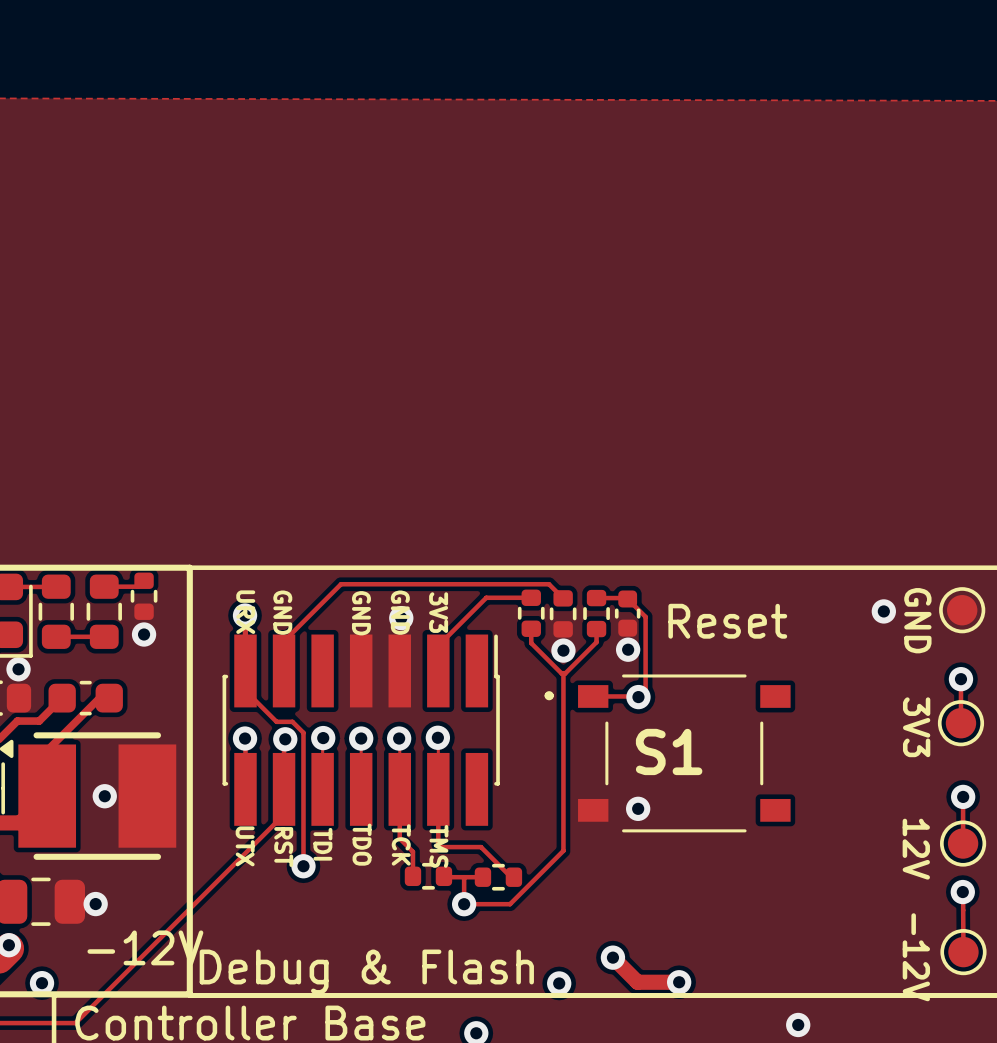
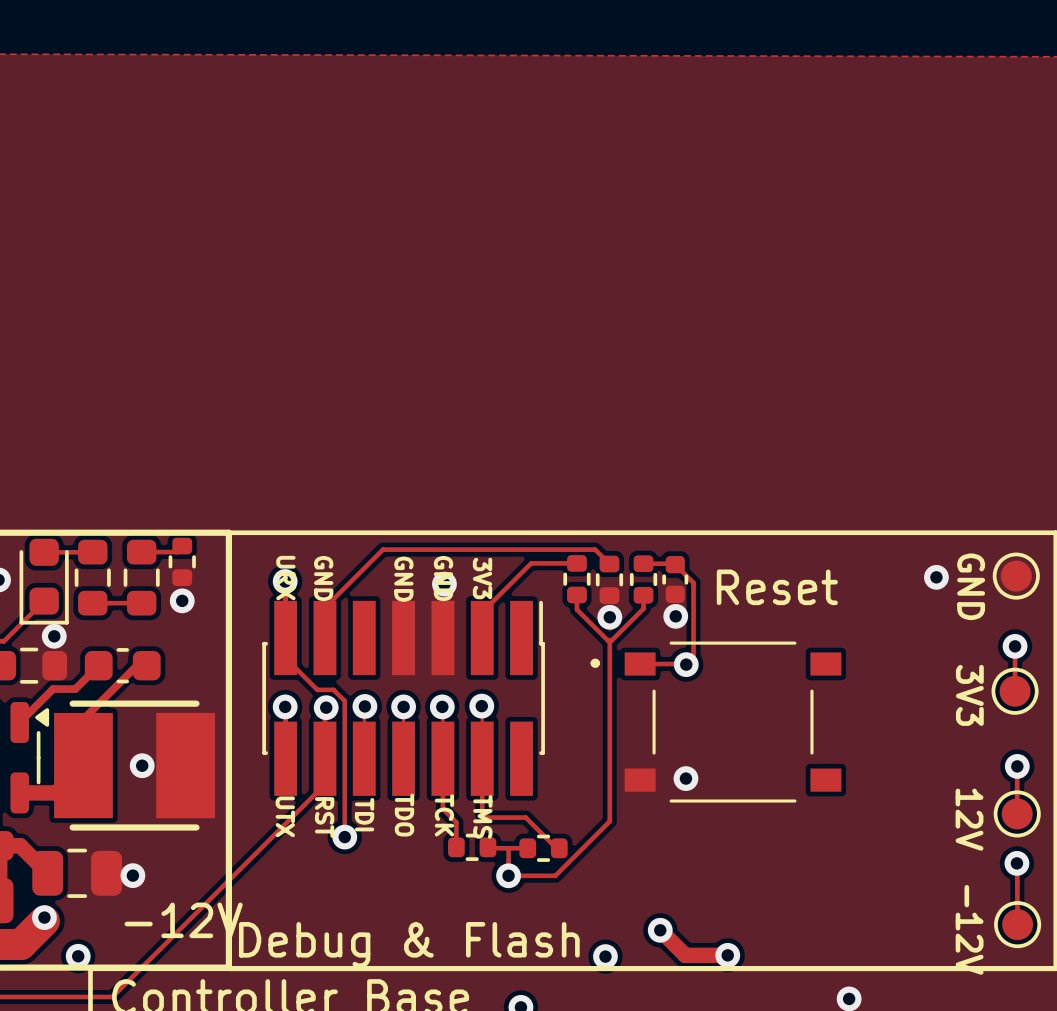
S1 name: S1 (669, 751) -> none

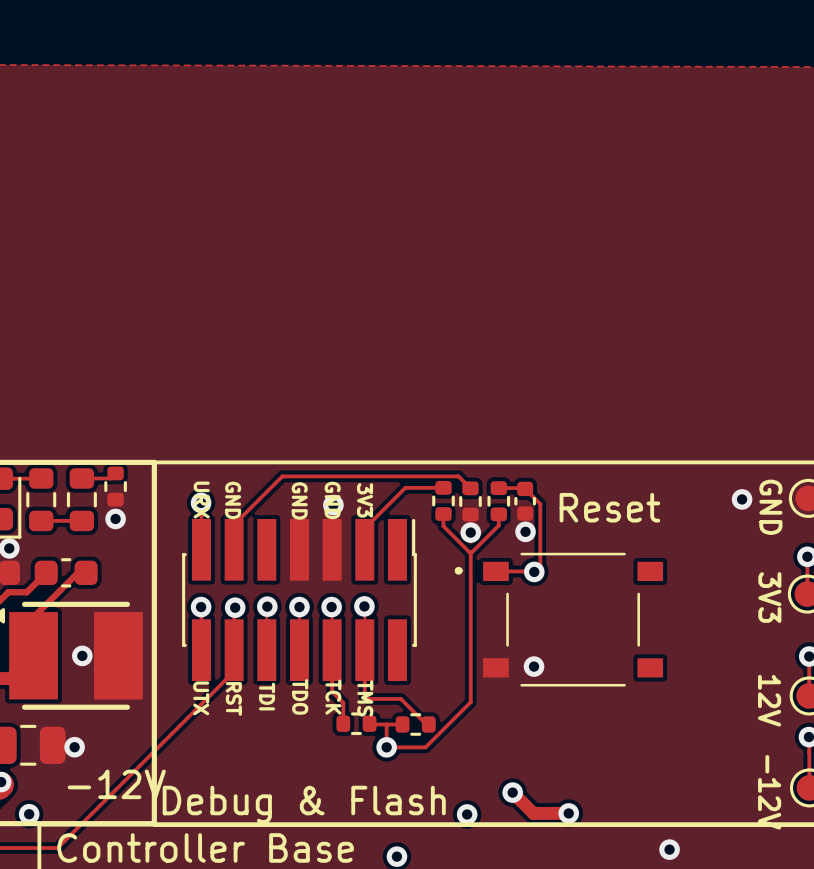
track: (285, 581) (285, 657) (317, 689) (333, 689) (344, 701) (344, 837) -> none
via: (344, 837) -> none

